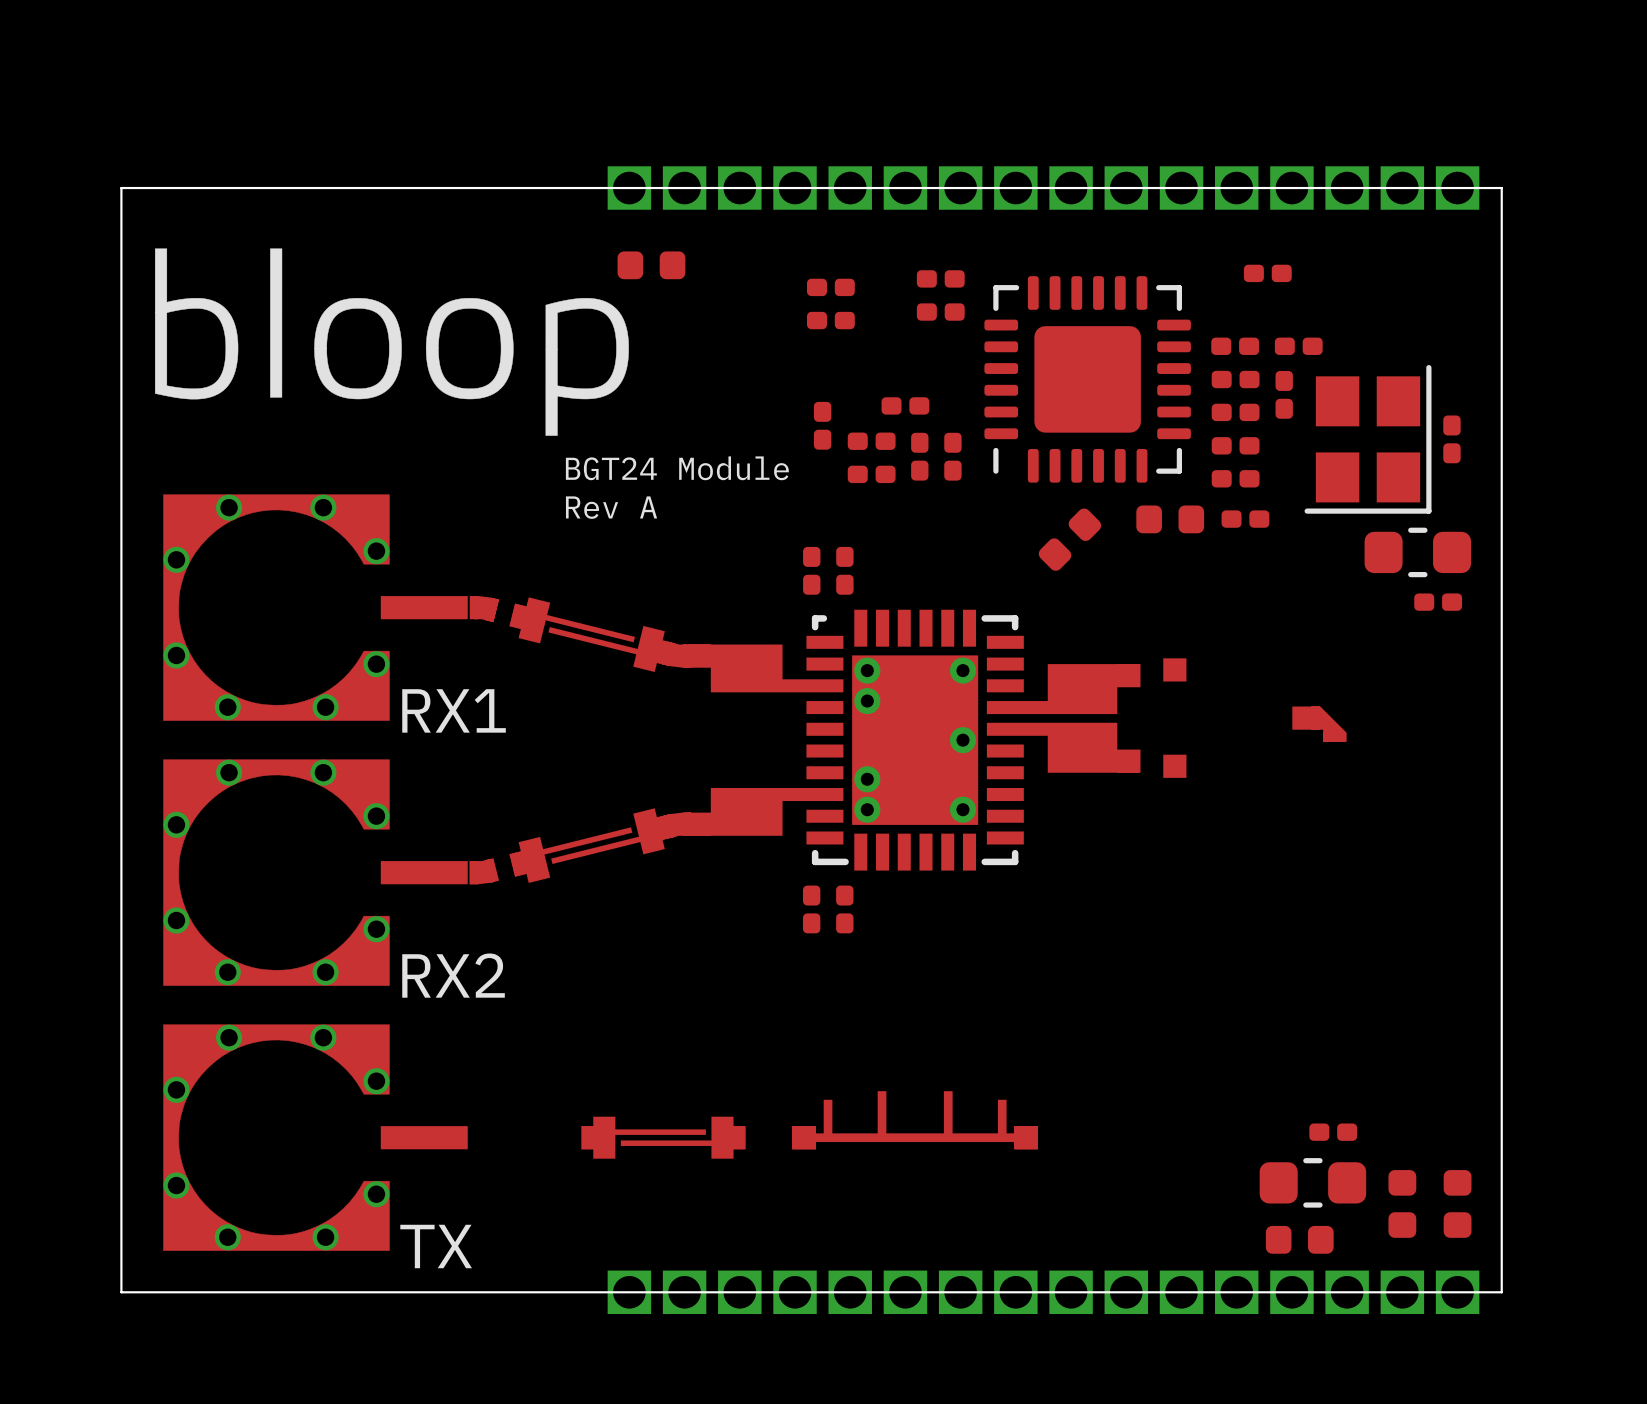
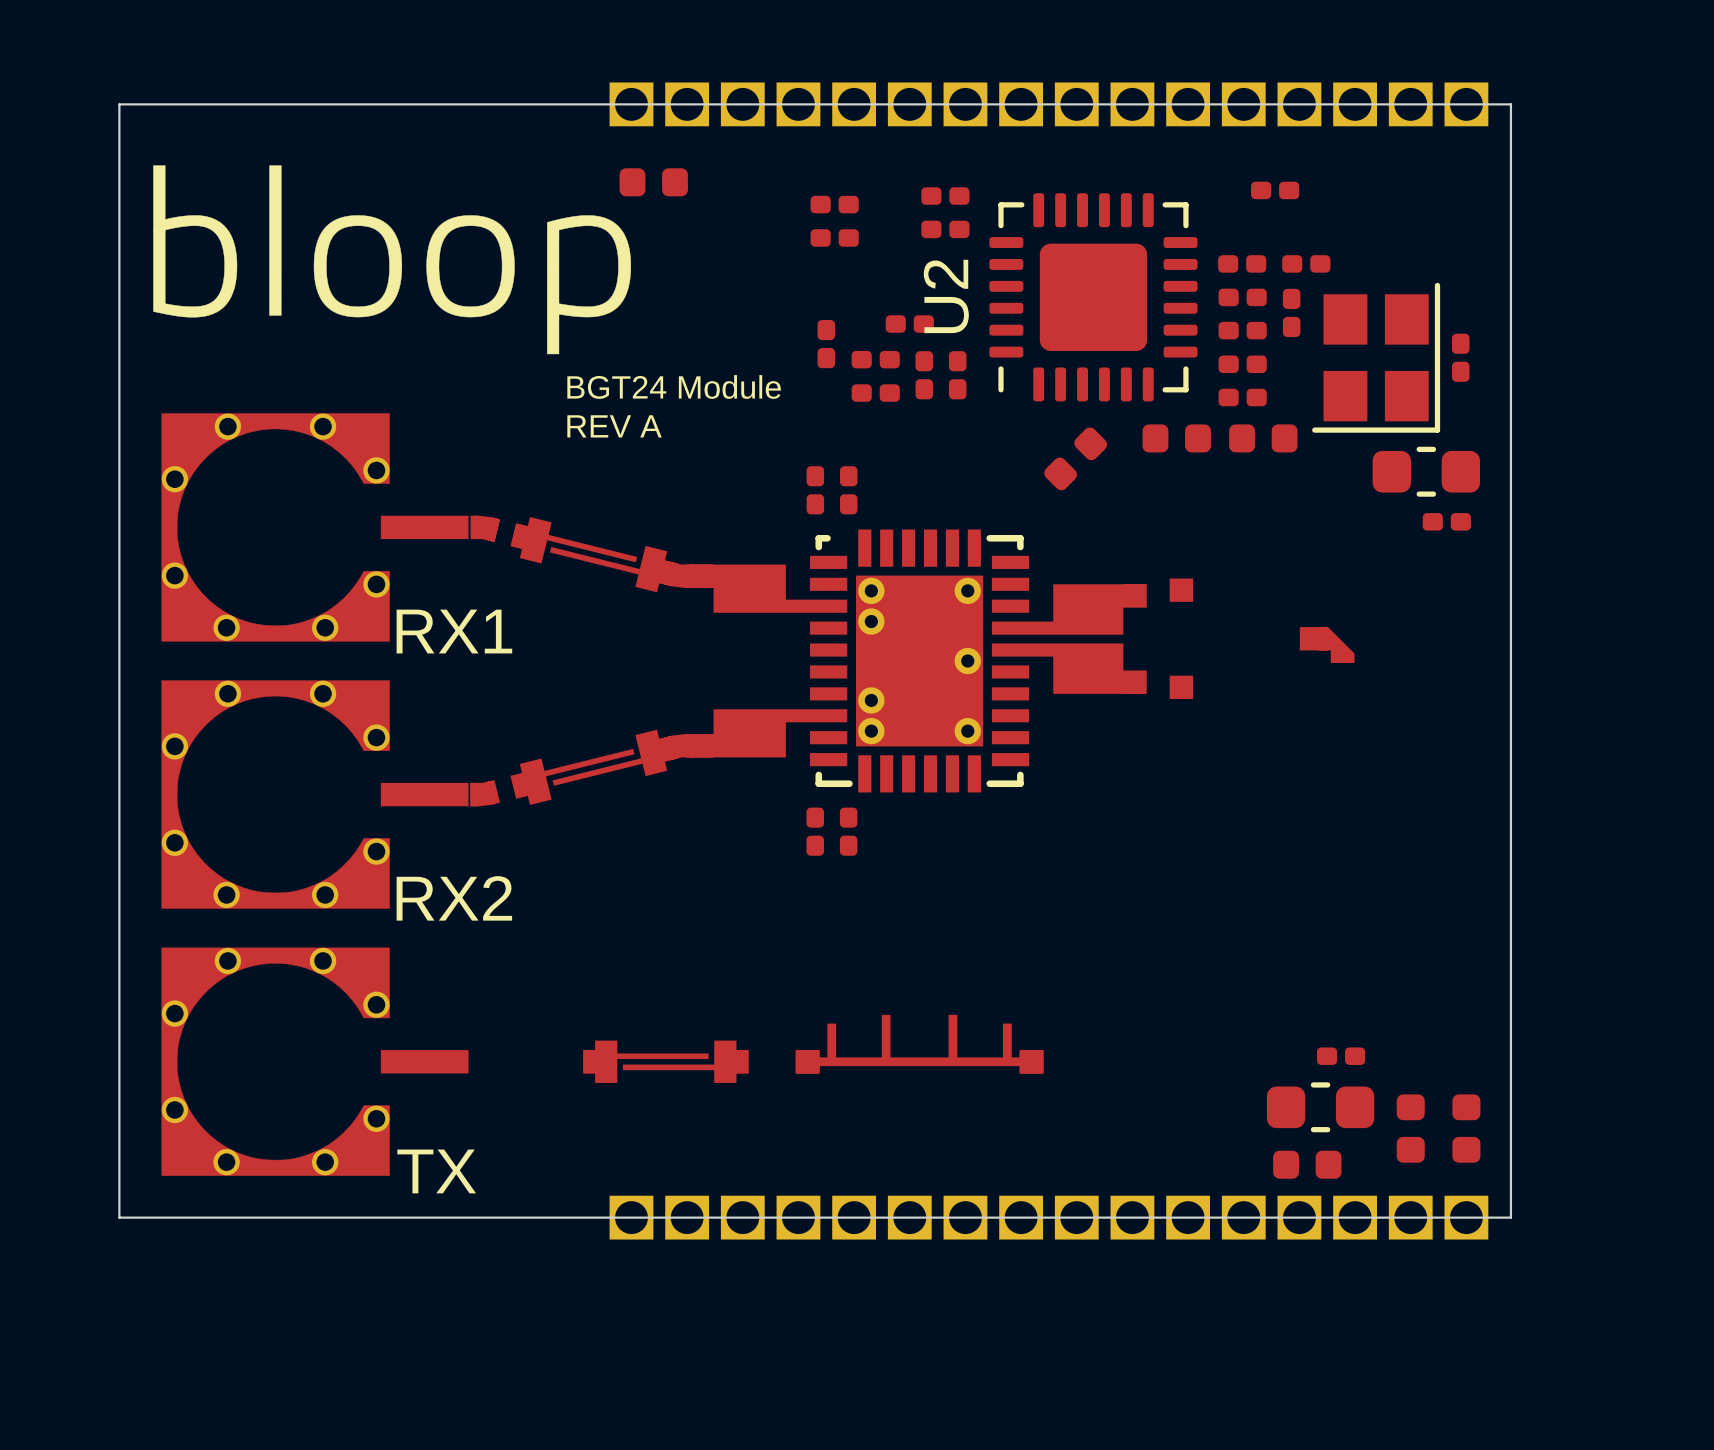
U2 name: none -> U2 (946, 296)
text: Rev A (611, 507) -> REV A (614, 426)
part footprint: [1221, 510, 1270, 528] -> [1229, 424, 1298, 453]

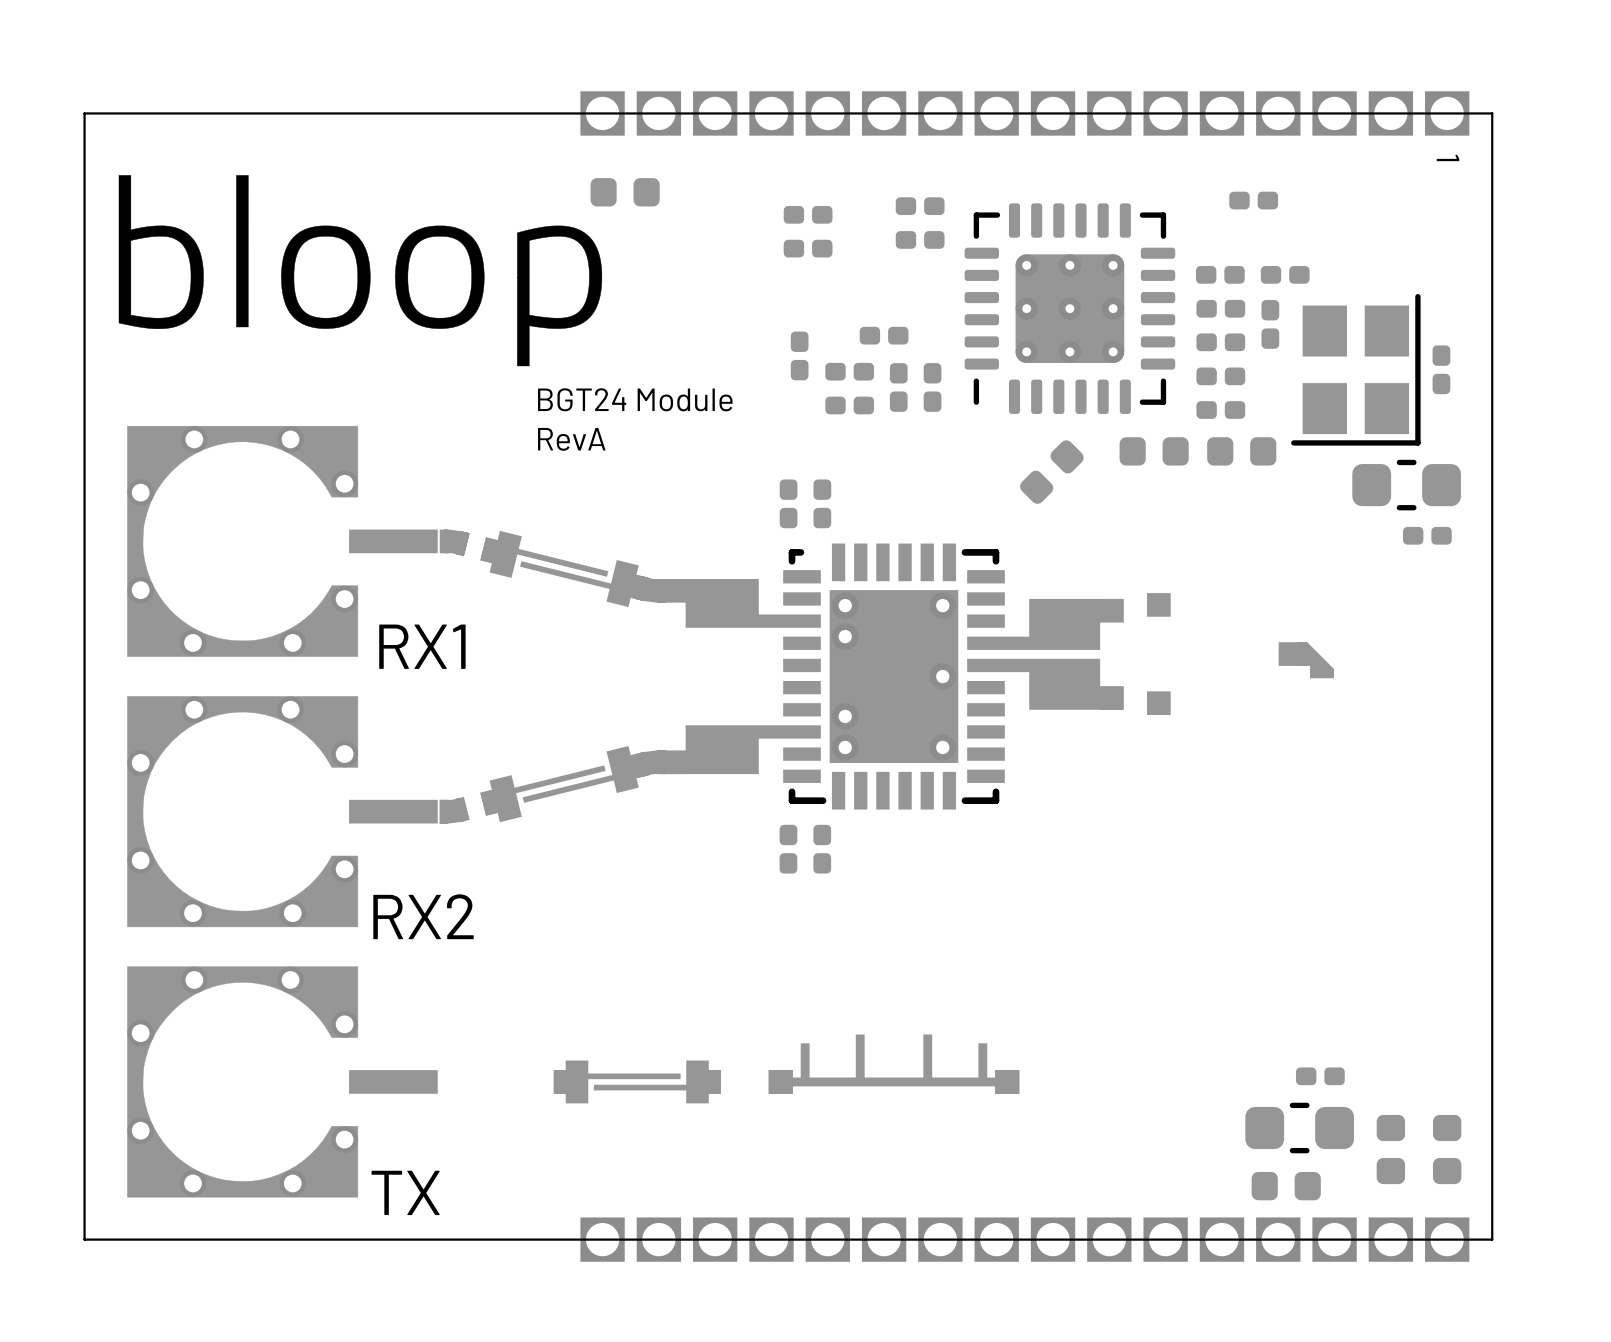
text: none -> 1 (1448, 157)
U2: (1093, 297) -> none
part: none -> (1069, 308)
text: REV A (614, 426) -> RevA (571, 439)

